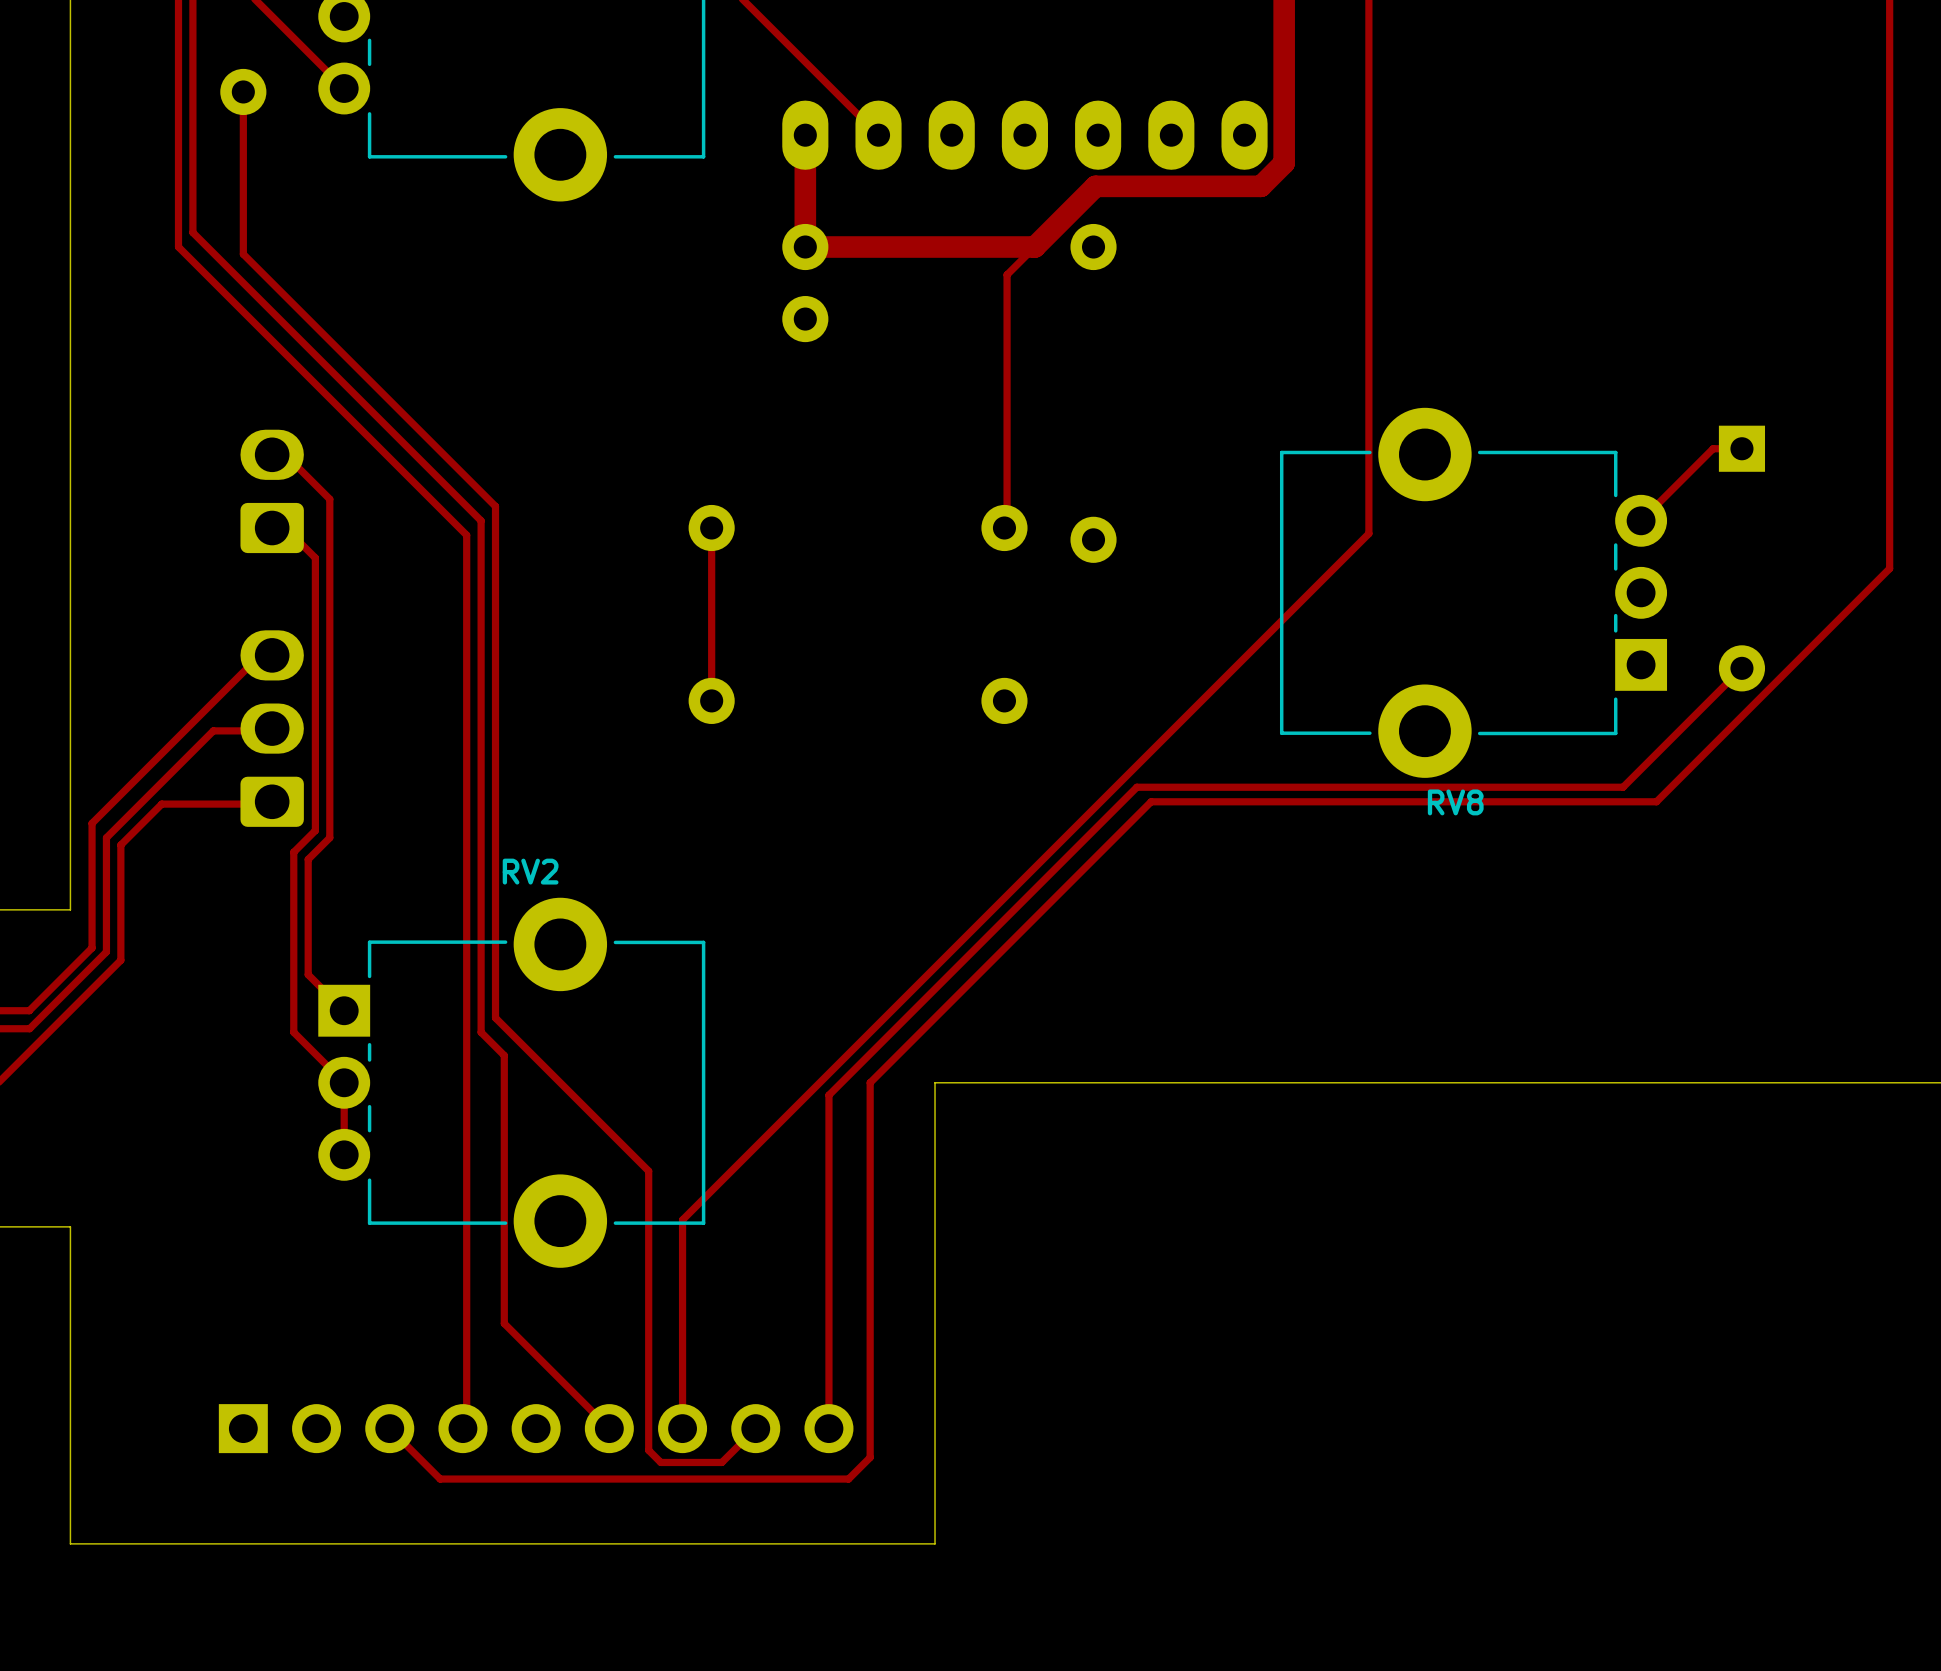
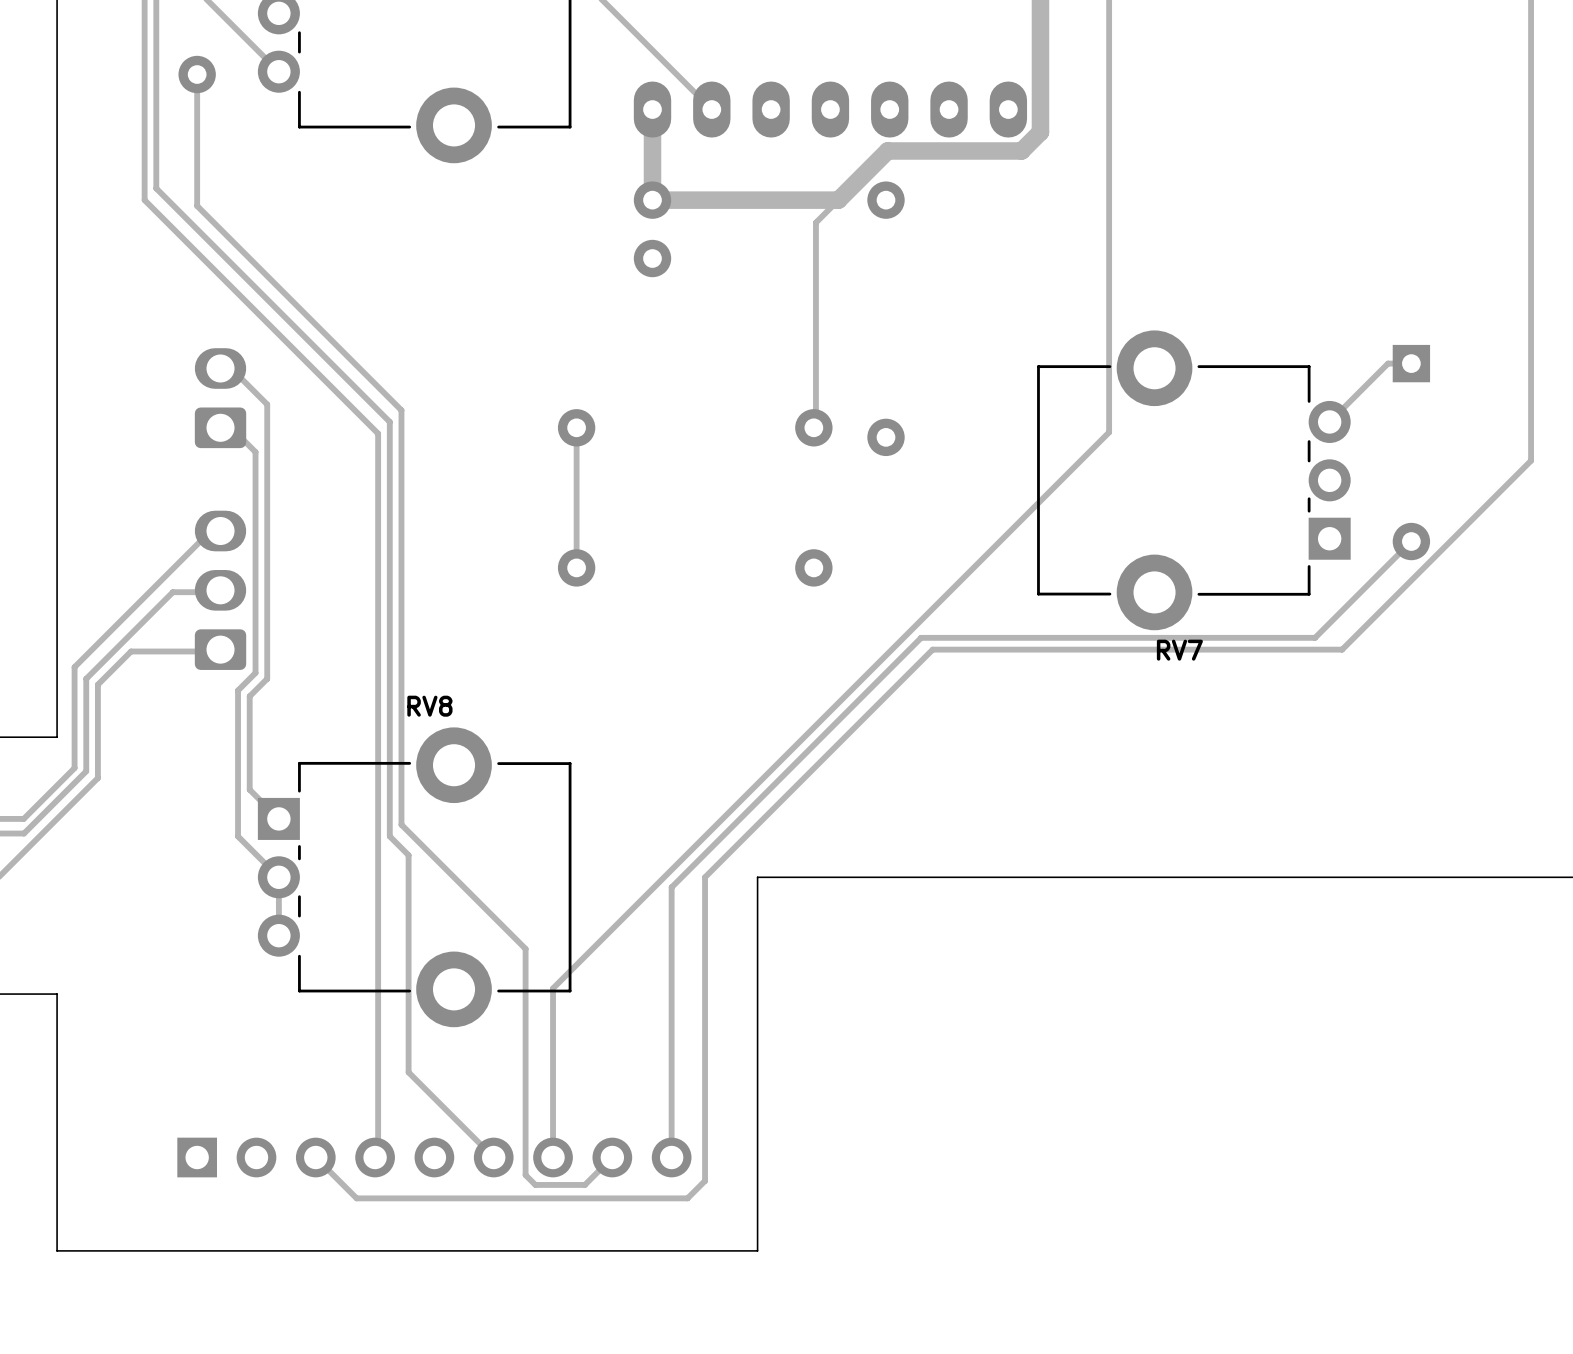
RV8 name: RV8 (1455, 802) -> RV7 (1179, 650)
RV2 name: RV2 (530, 871) -> RV8 (429, 706)

